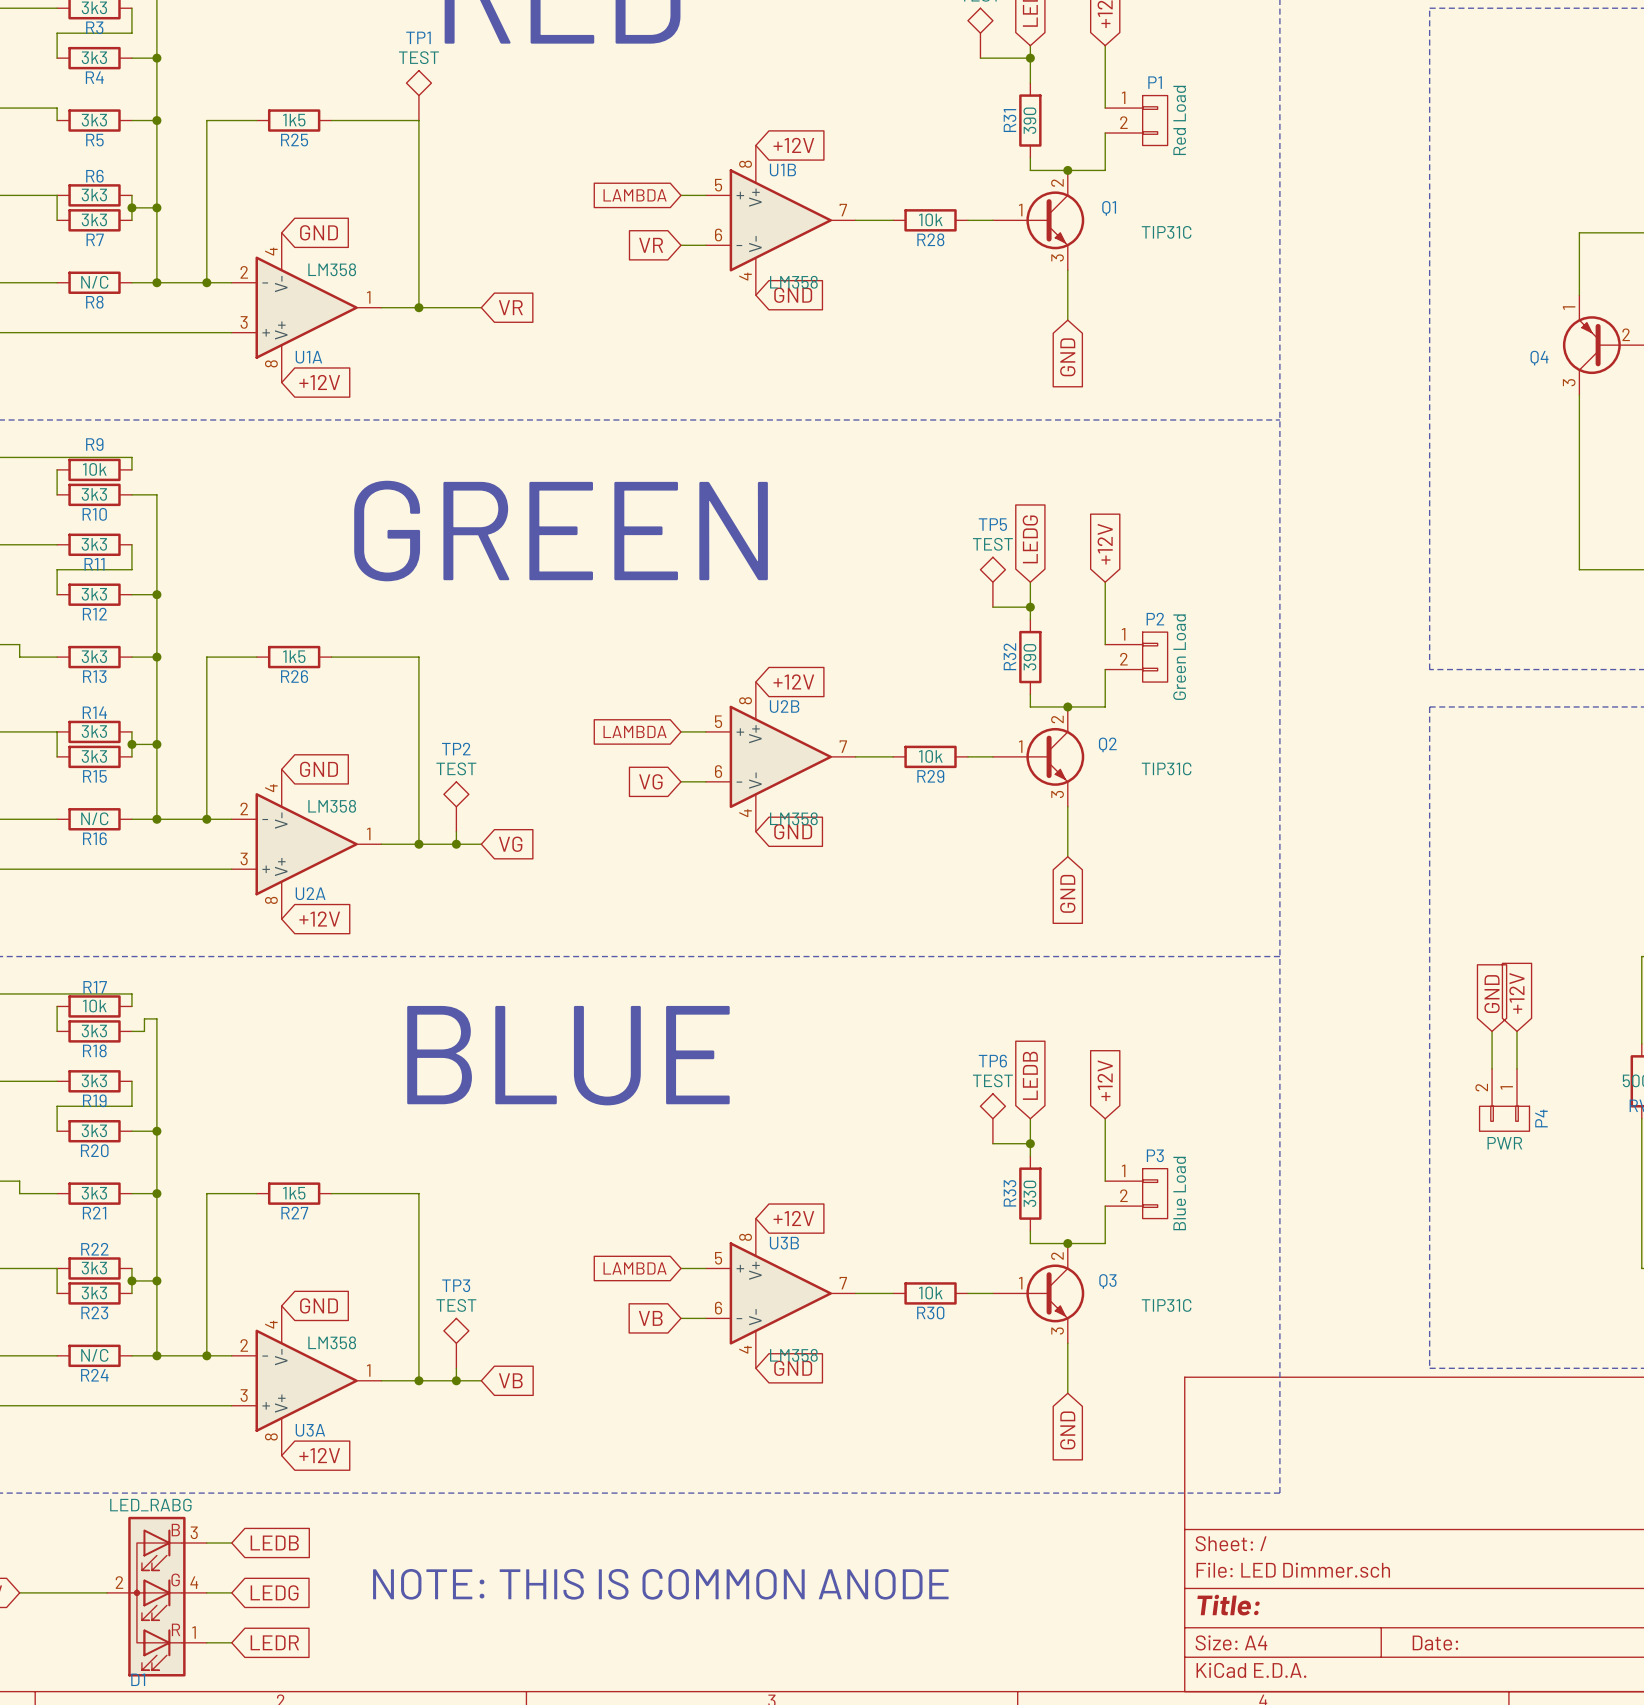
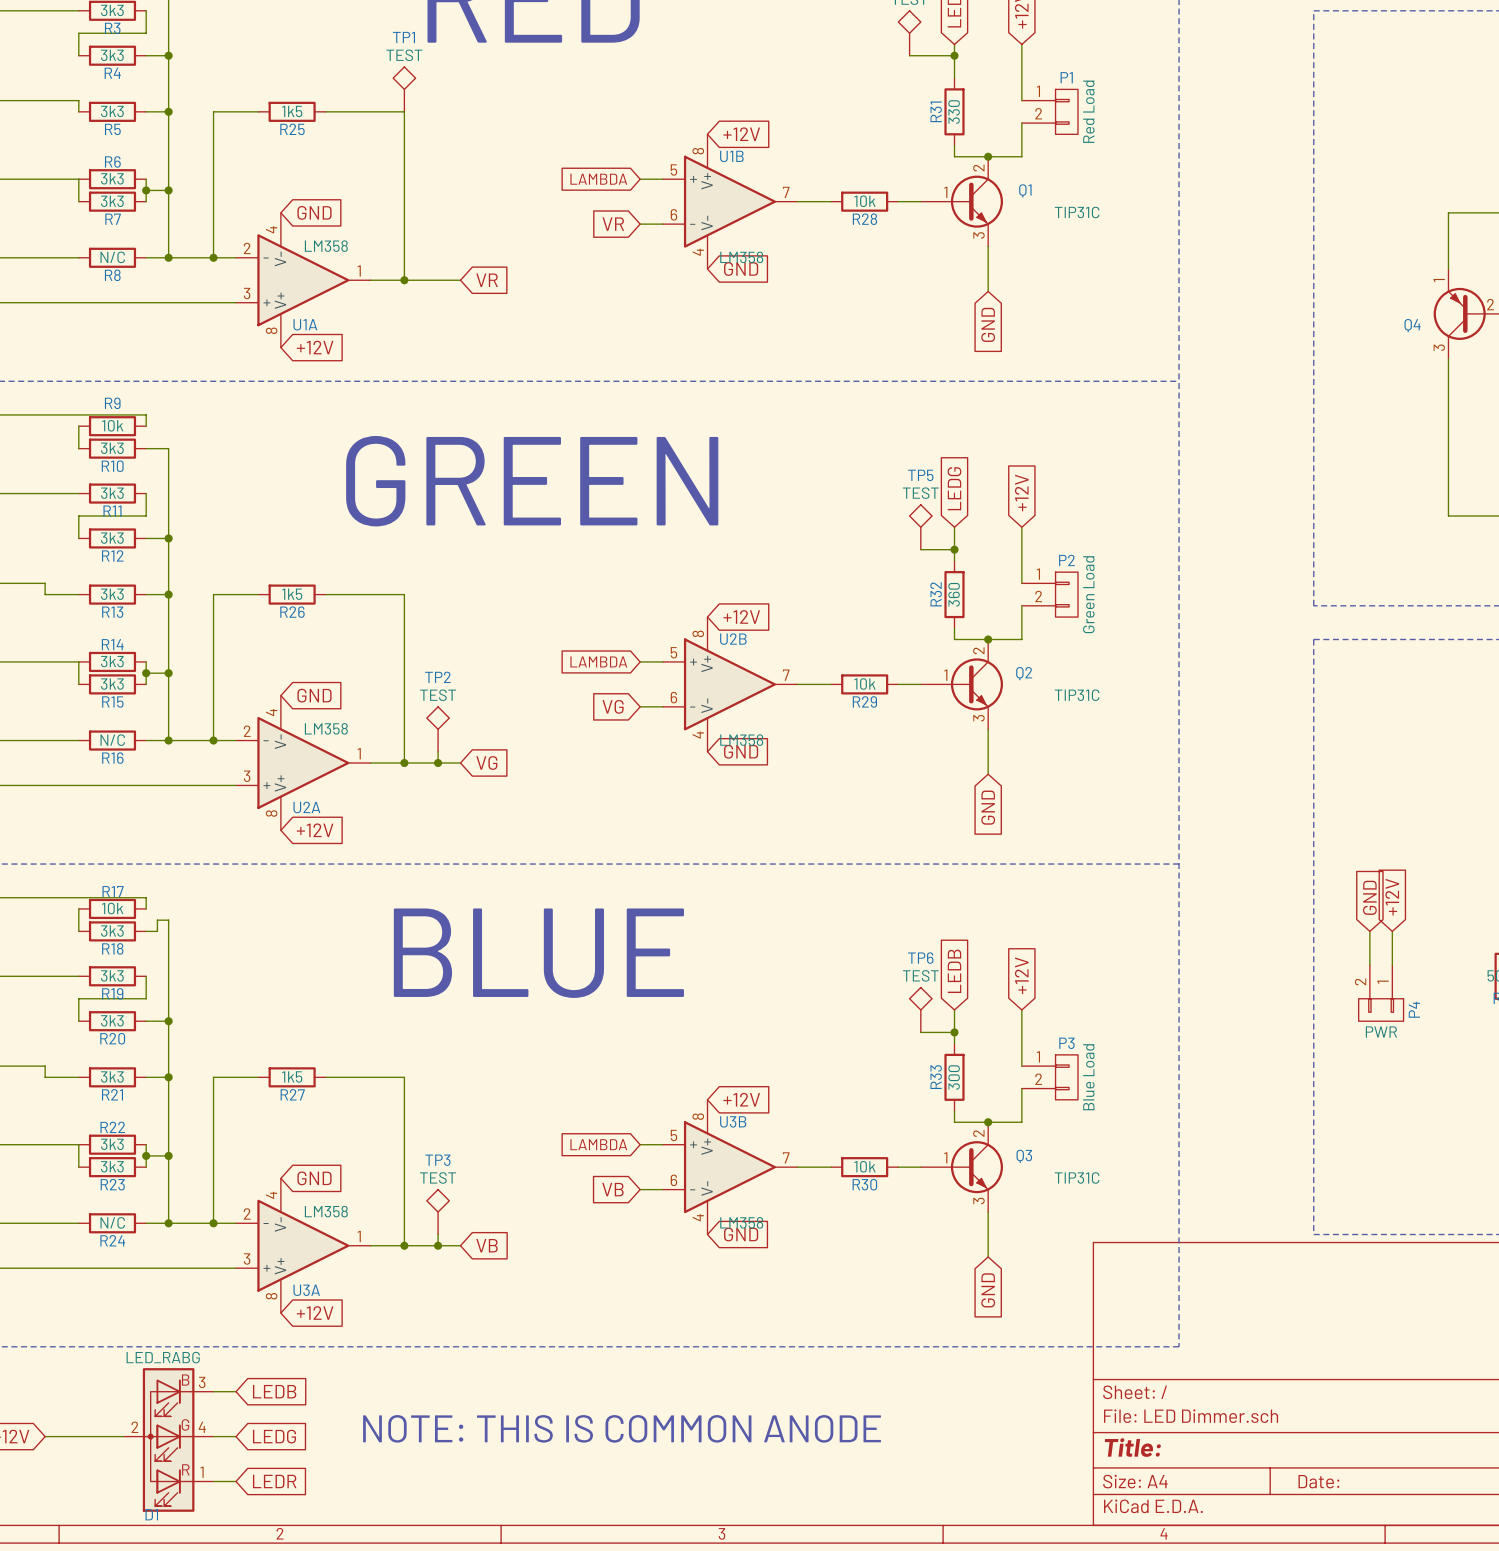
R31 value: 390 (1029, 120) -> 330 (954, 112)
R32 value: 390 (1029, 657) -> 360 (954, 594)
R33 value: 330 (1029, 1193) -> 300 (954, 1077)

